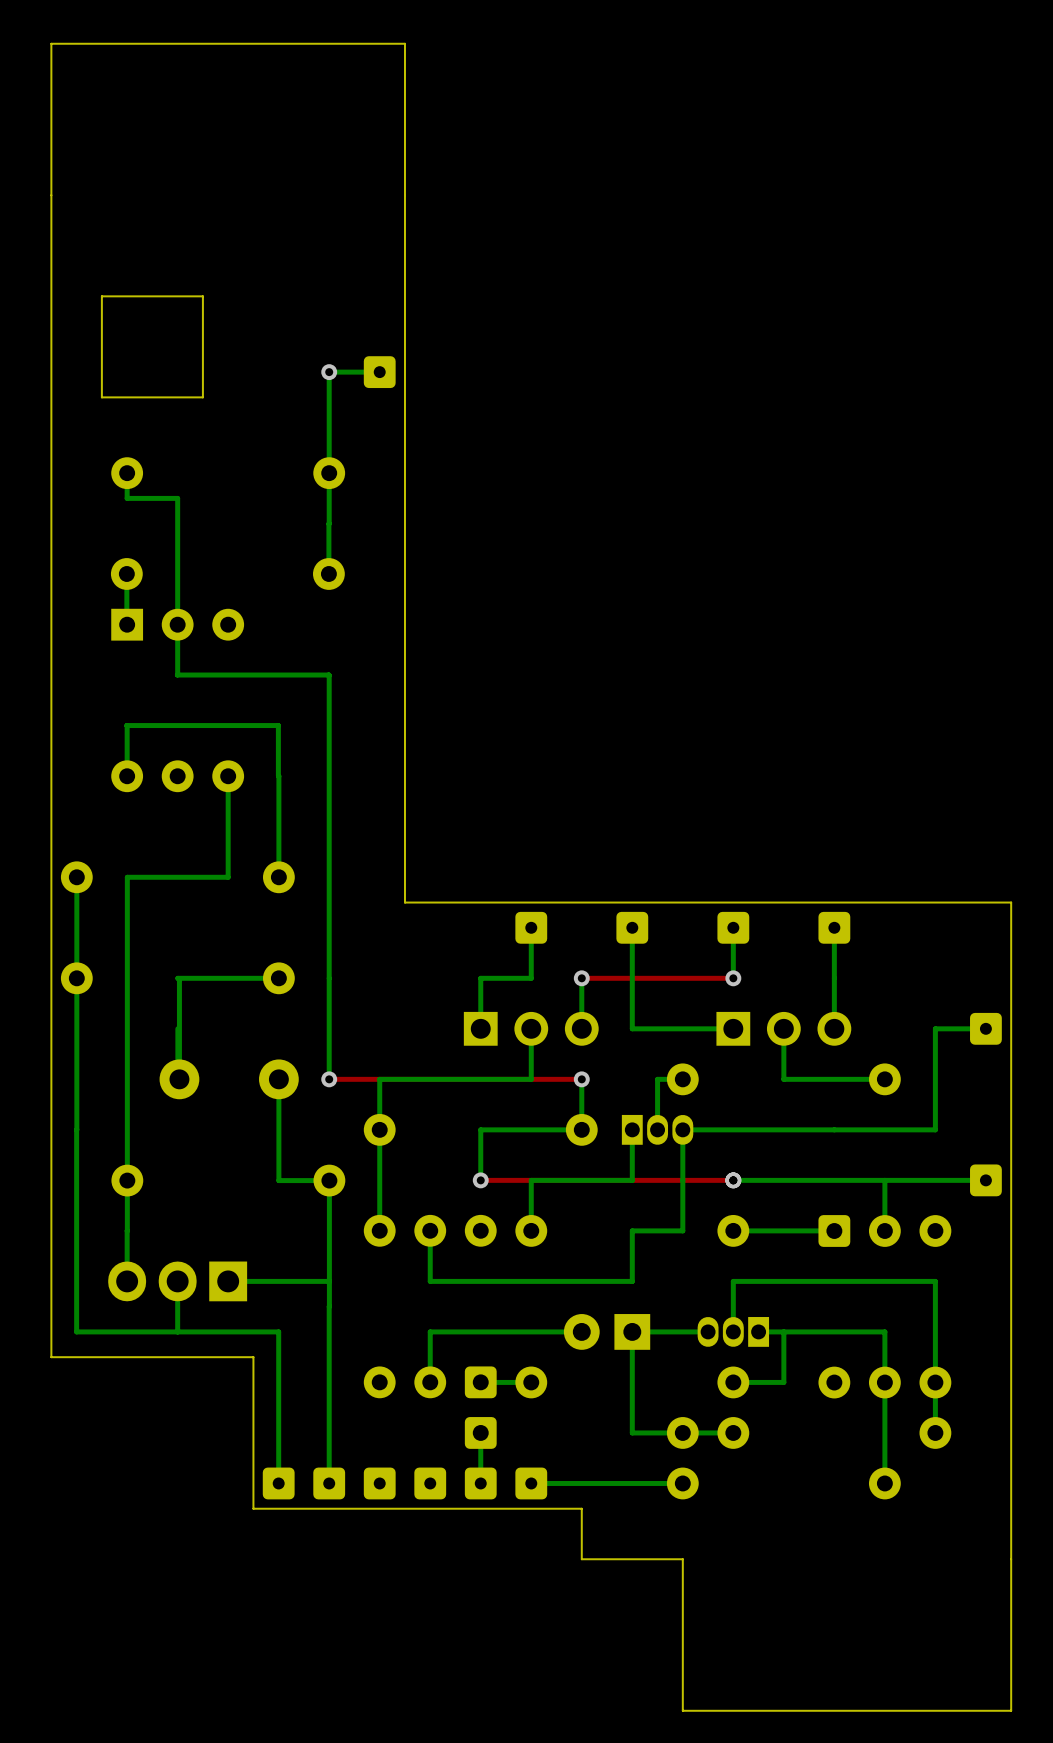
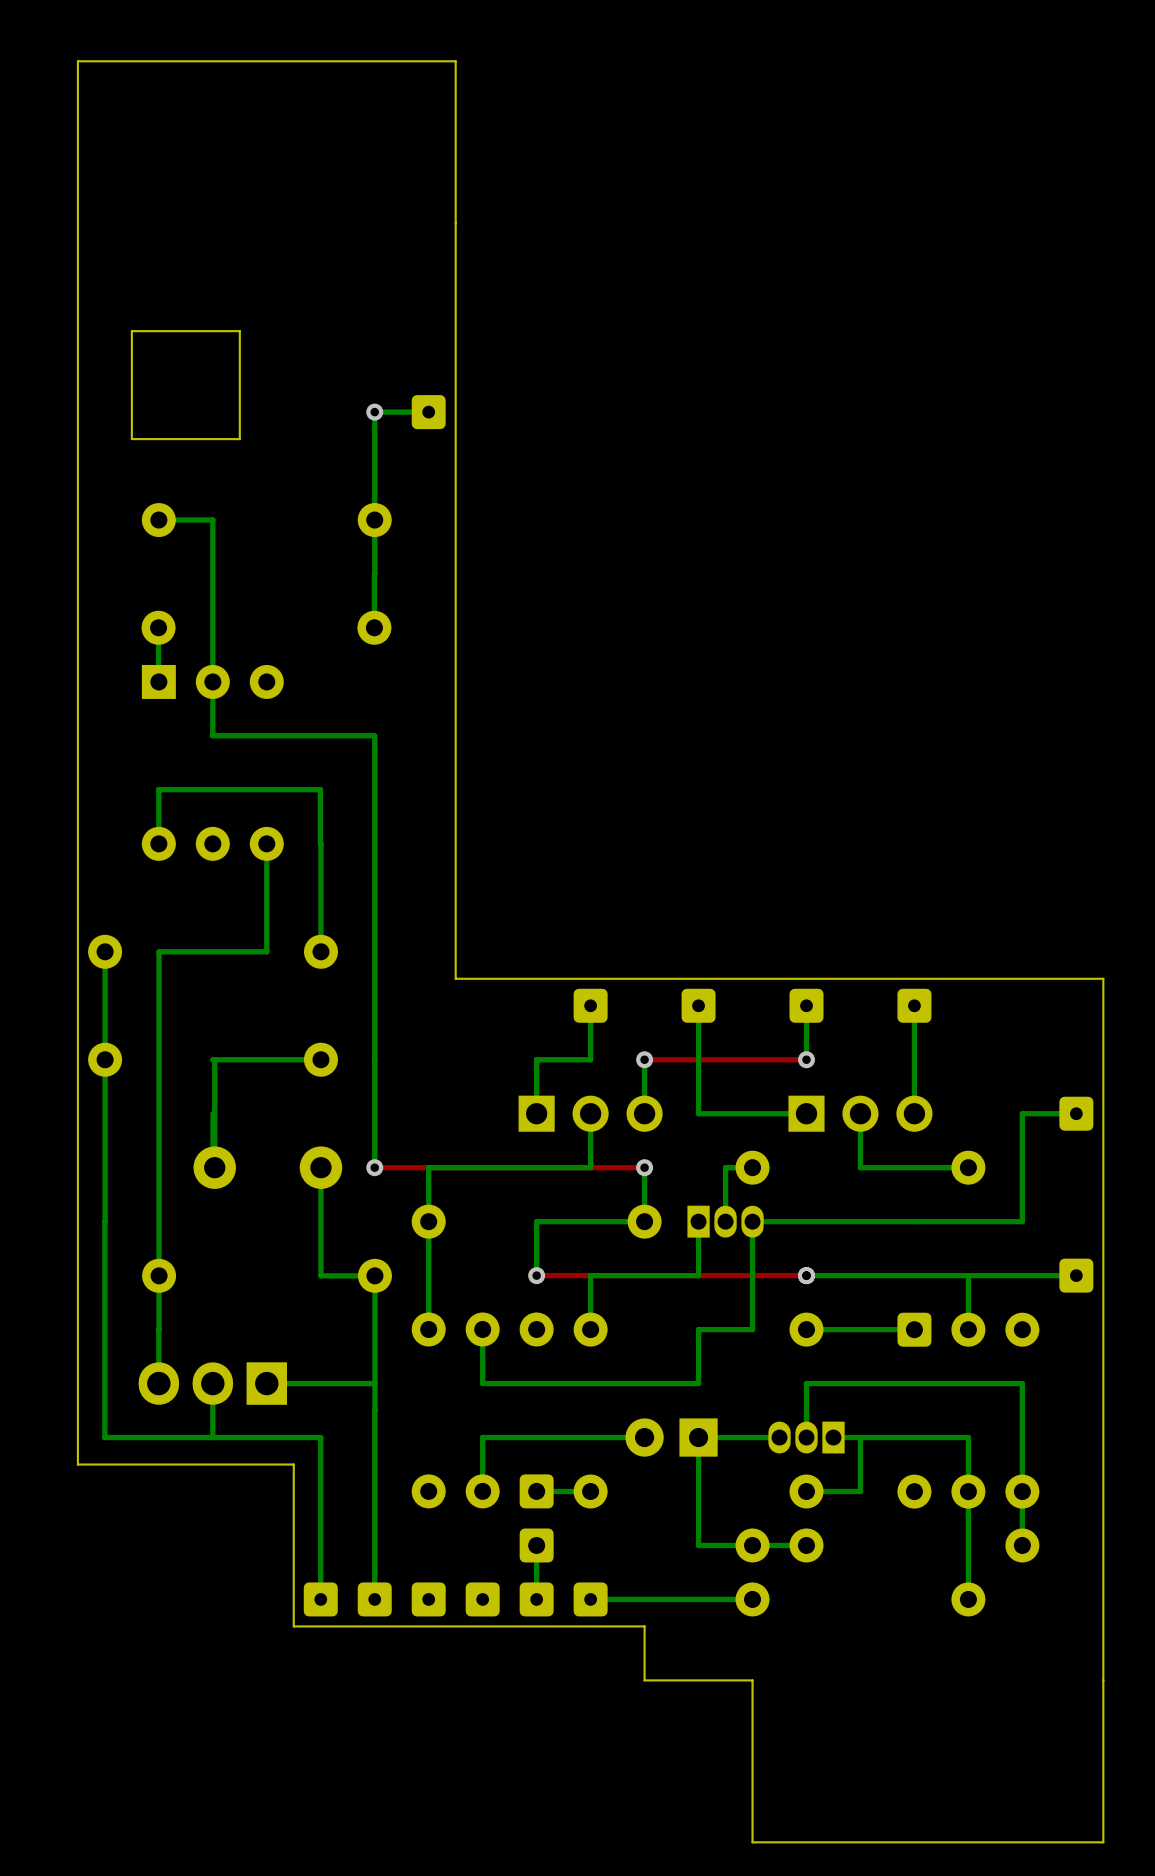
bottom track: (127, 473) (127, 498) (177, 498) -> (158, 520) (212, 520) (212, 547)

